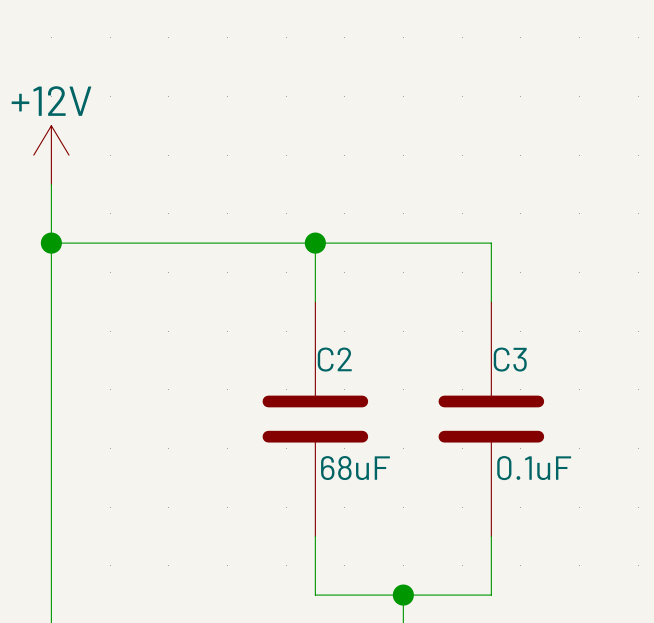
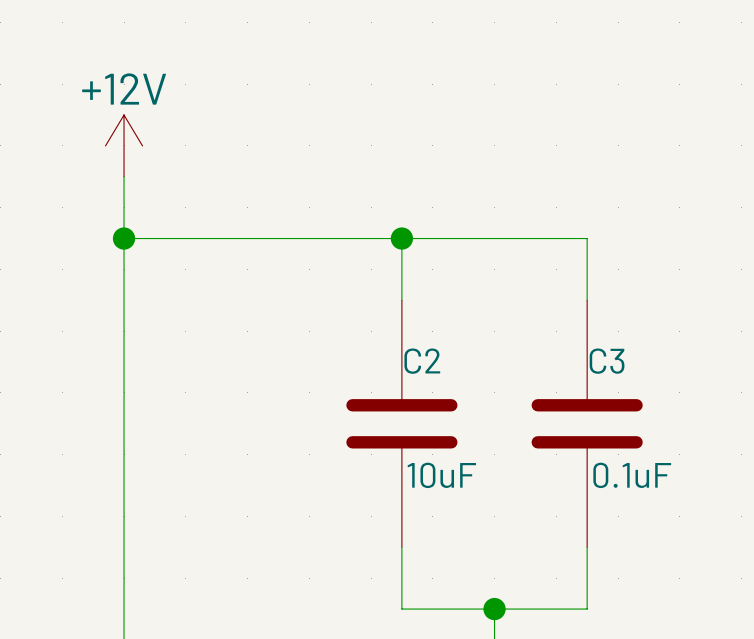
C2 value: 68uF (355, 468) -> 10uF (441, 475)

